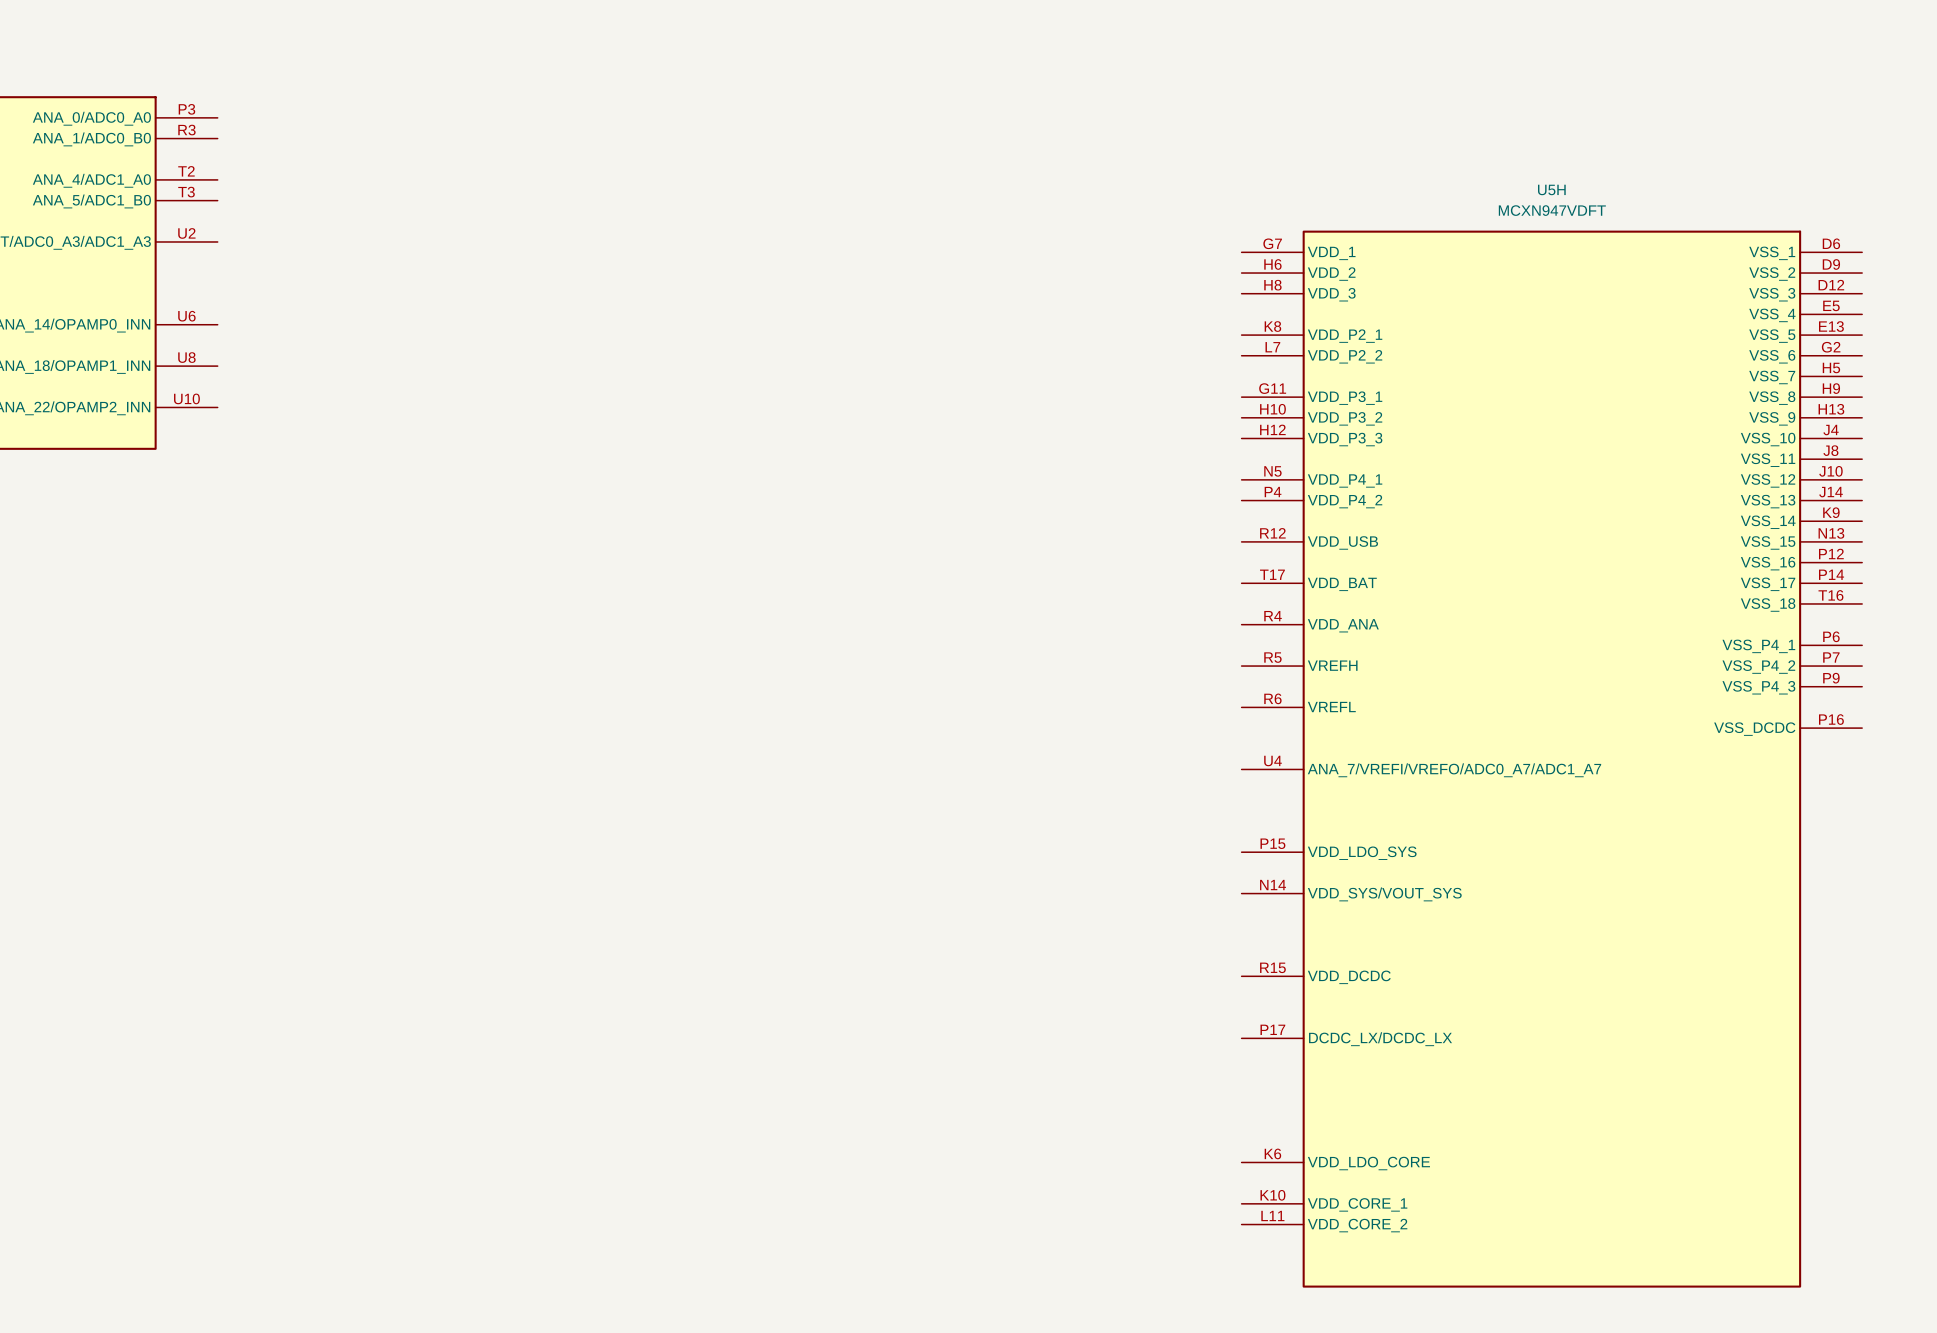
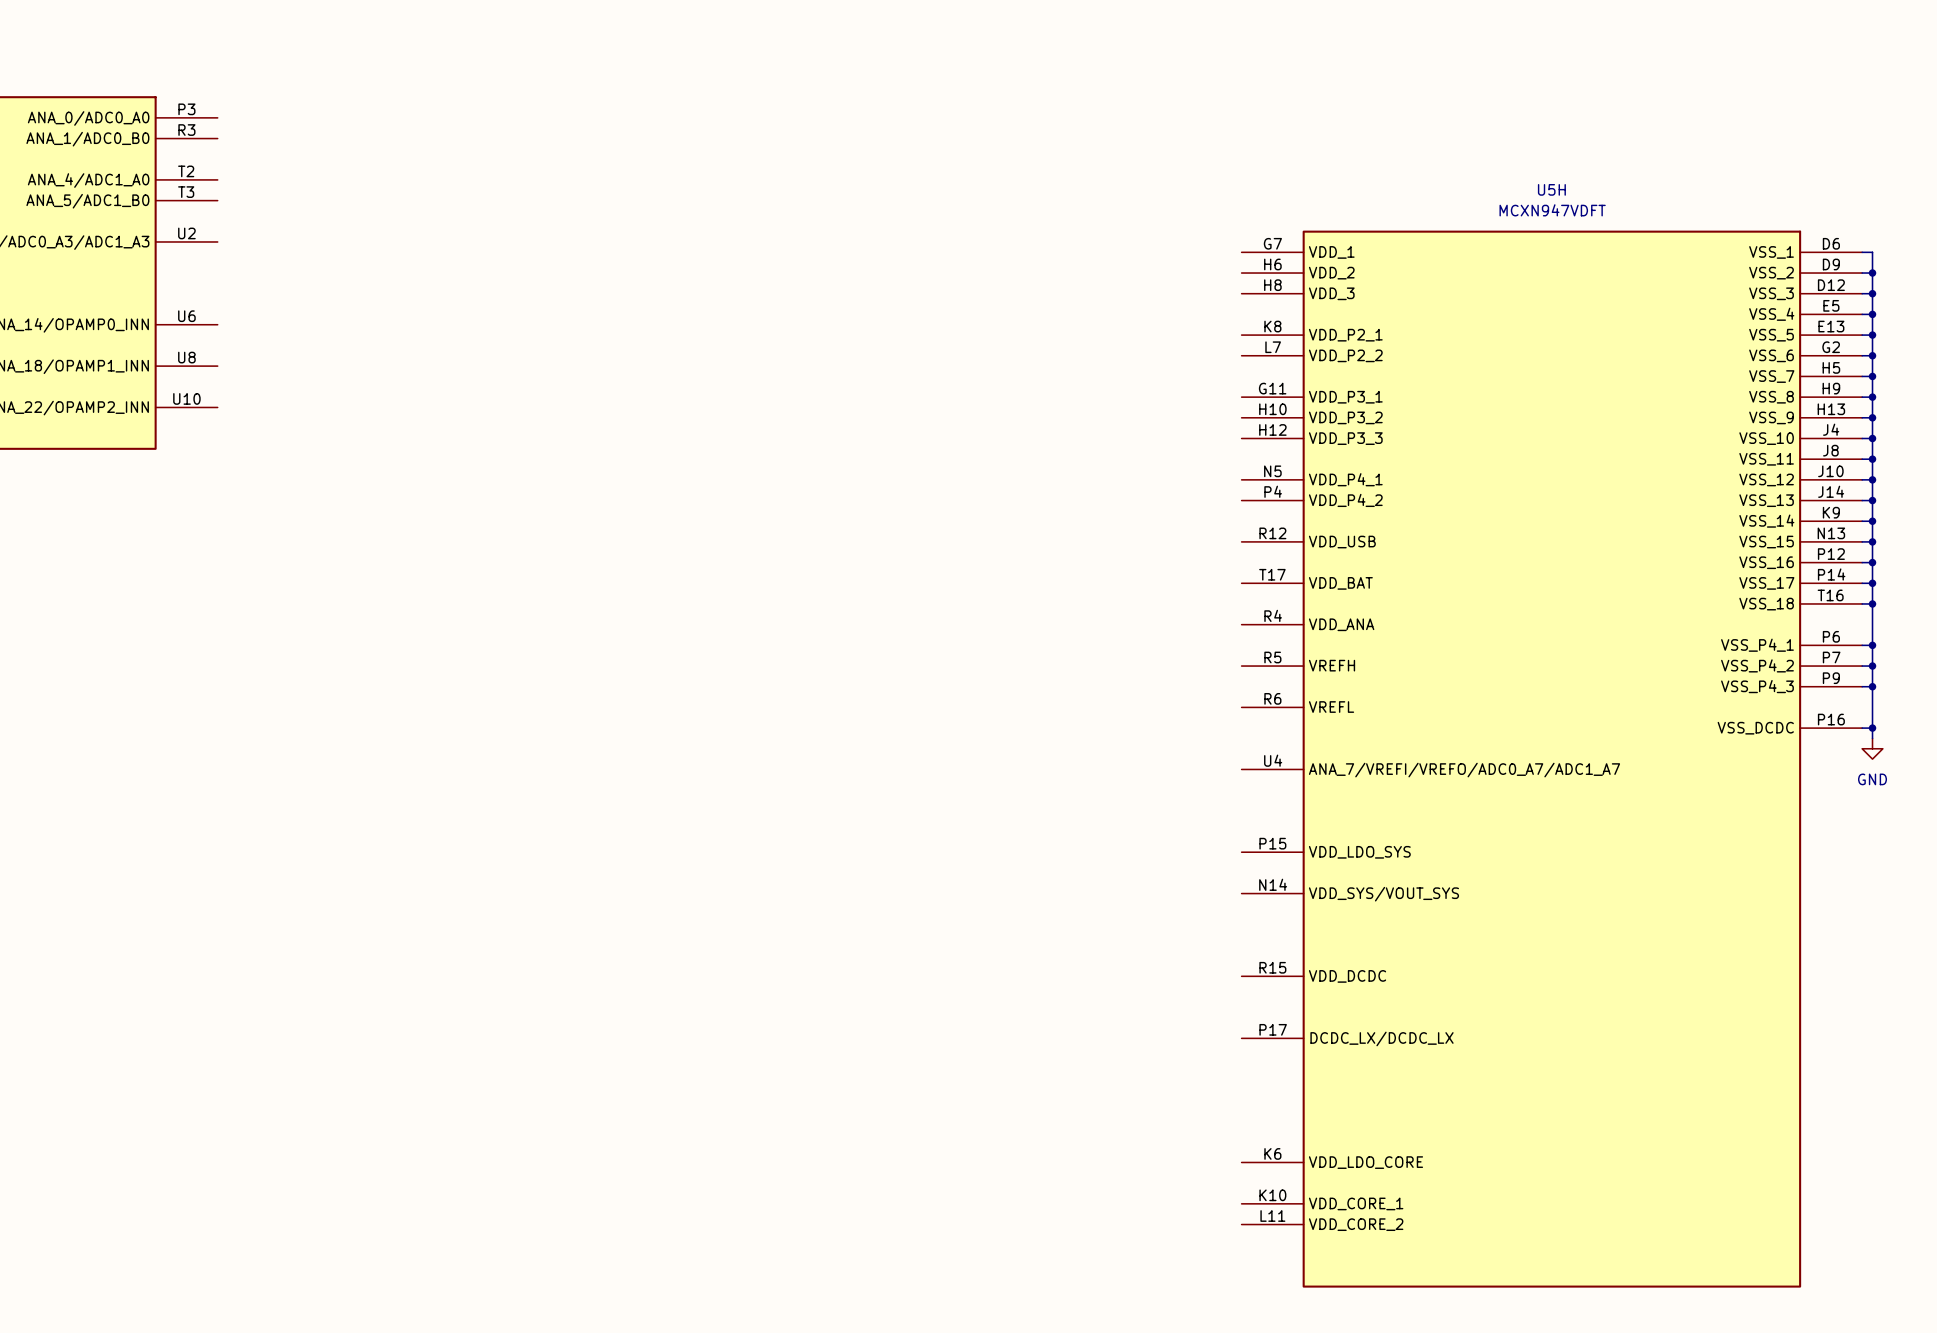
wire: none -> (1862, 252) (1872, 252) (1872, 738)
wire: none -> (1862, 273) (1872, 273)
junction: none -> (1872, 273)
wire: none -> (1862, 293) (1872, 293)
junction: none -> (1872, 293)
wire: none -> (1862, 314) (1872, 314)
junction: none -> (1872, 314)
wire: none -> (1862, 335) (1872, 335)
junction: none -> (1872, 335)
wire: none -> (1862, 355) (1872, 355)
junction: none -> (1872, 355)
wire: none -> (1862, 376) (1872, 376)
junction: none -> (1872, 376)
wire: none -> (1862, 397) (1872, 397)
junction: none -> (1872, 397)
wire: none -> (1862, 417) (1872, 417)
junction: none -> (1872, 417)
wire: none -> (1862, 438) (1872, 438)
junction: none -> (1872, 438)
wire: none -> (1862, 459) (1872, 459)
junction: none -> (1872, 459)
wire: none -> (1862, 479) (1872, 479)
junction: none -> (1872, 479)
wire: none -> (1862, 500) (1872, 500)
junction: none -> (1872, 500)
wire: none -> (1862, 521) (1872, 521)
junction: none -> (1872, 521)
wire: none -> (1862, 541) (1872, 541)
junction: none -> (1872, 541)
wire: none -> (1862, 562) (1872, 562)
junction: none -> (1872, 562)
wire: none -> (1862, 583) (1872, 583)
junction: none -> (1872, 583)
wire: none -> (1862, 603) (1872, 603)
junction: none -> (1872, 603)
wire: none -> (1862, 645) (1872, 645)
junction: none -> (1872, 645)
wire: none -> (1862, 666) (1872, 666)
junction: none -> (1872, 666)
wire: none -> (1862, 686) (1872, 686)
junction: none -> (1872, 686)
wire: none -> (1862, 728) (1872, 728)
junction: none -> (1872, 728)
power symbol: none -> GND (1872, 748)

